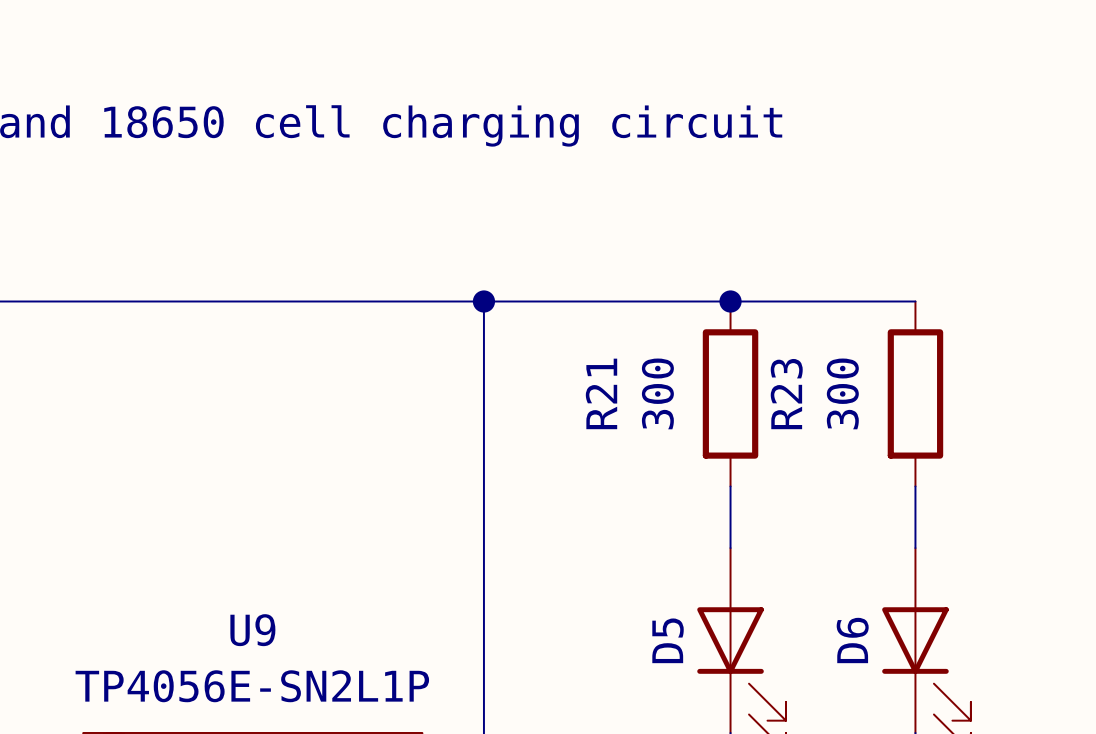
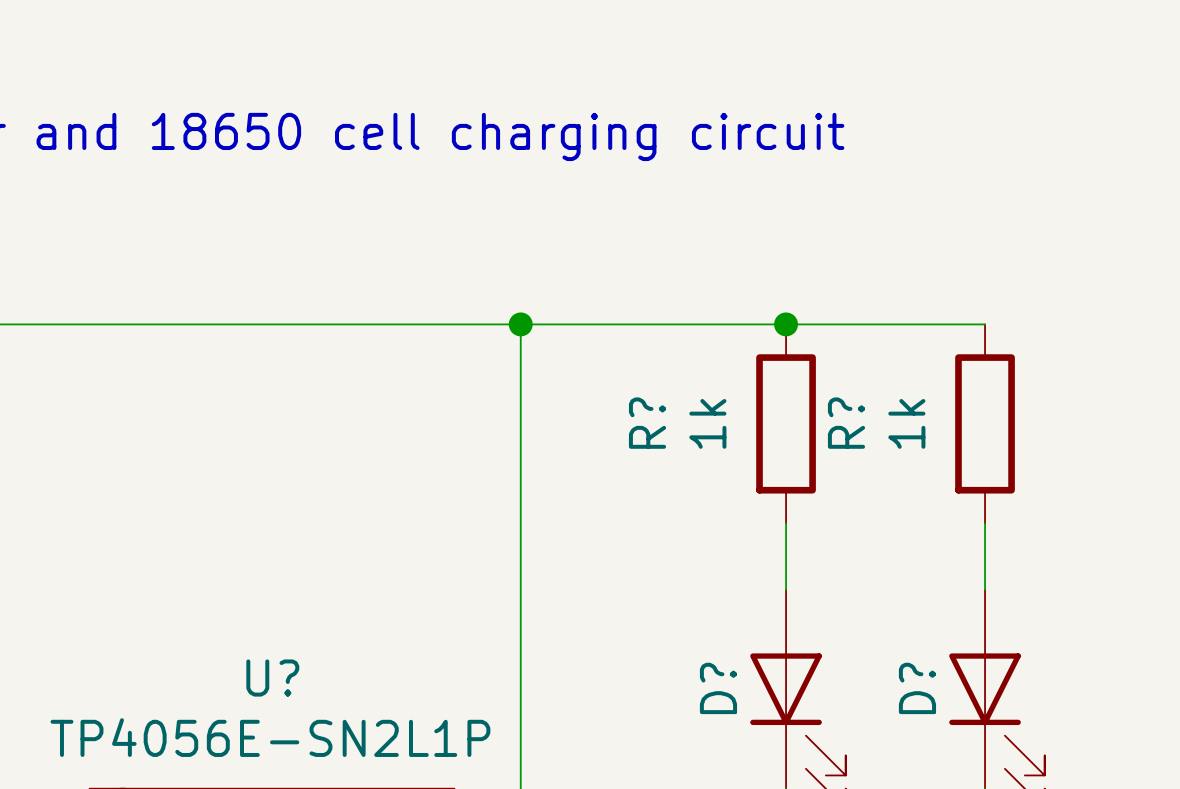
R21 name: R21 (601, 393) -> R? (647, 423)
R21 value: 300 (657, 393) -> 1k (707, 423)
R23 value: 300 (842, 393) -> 1k (906, 423)
R23 name: R23 (786, 394) -> R? (846, 423)
U9 name: U9 (252, 630) -> U? (272, 678)
D5 name: D5 (668, 640) -> D? (718, 688)
D6 name: D6 (852, 640) -> D? (917, 688)

